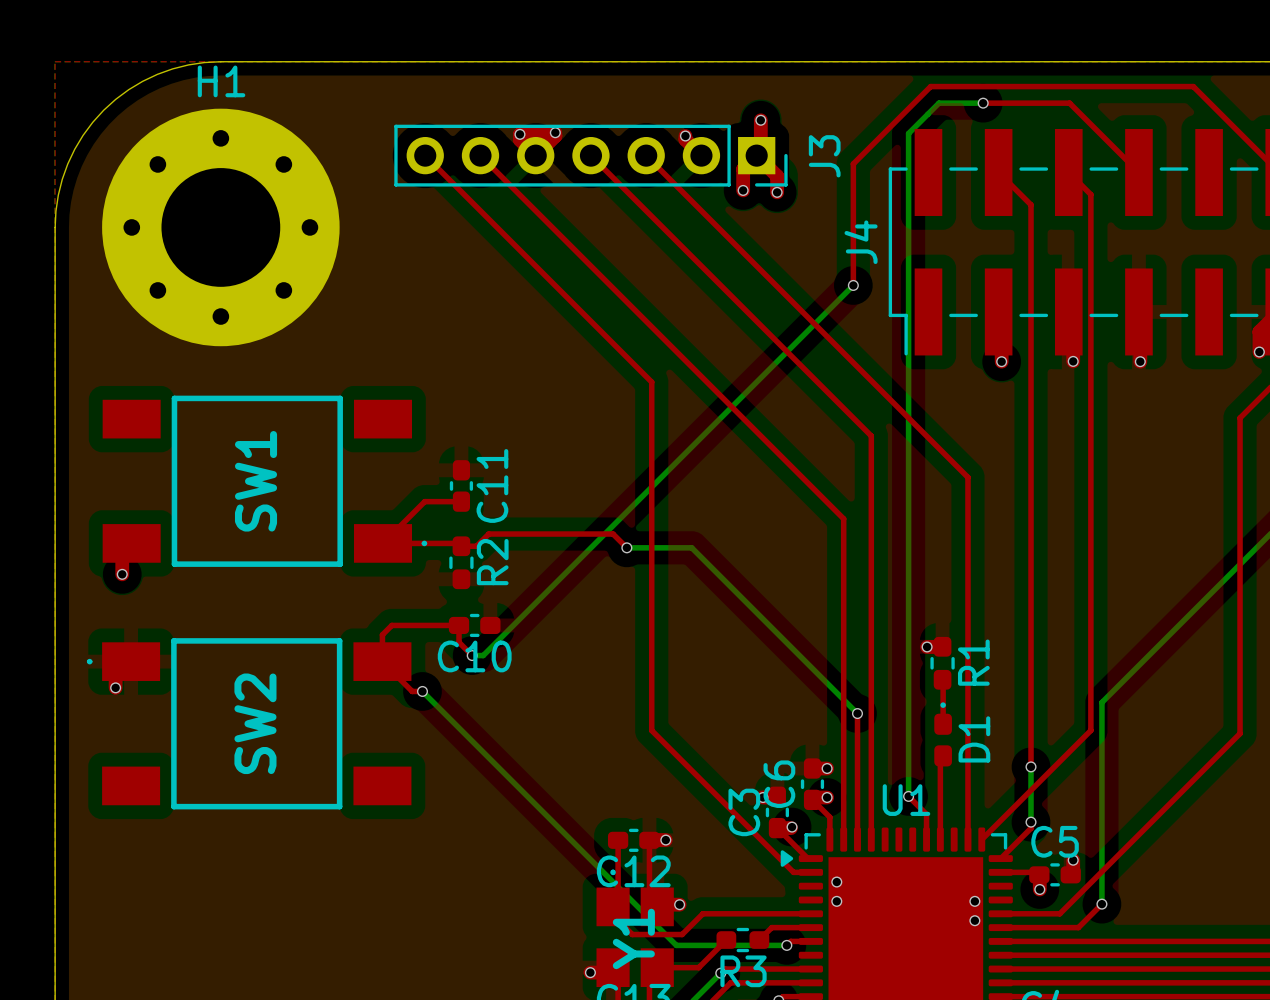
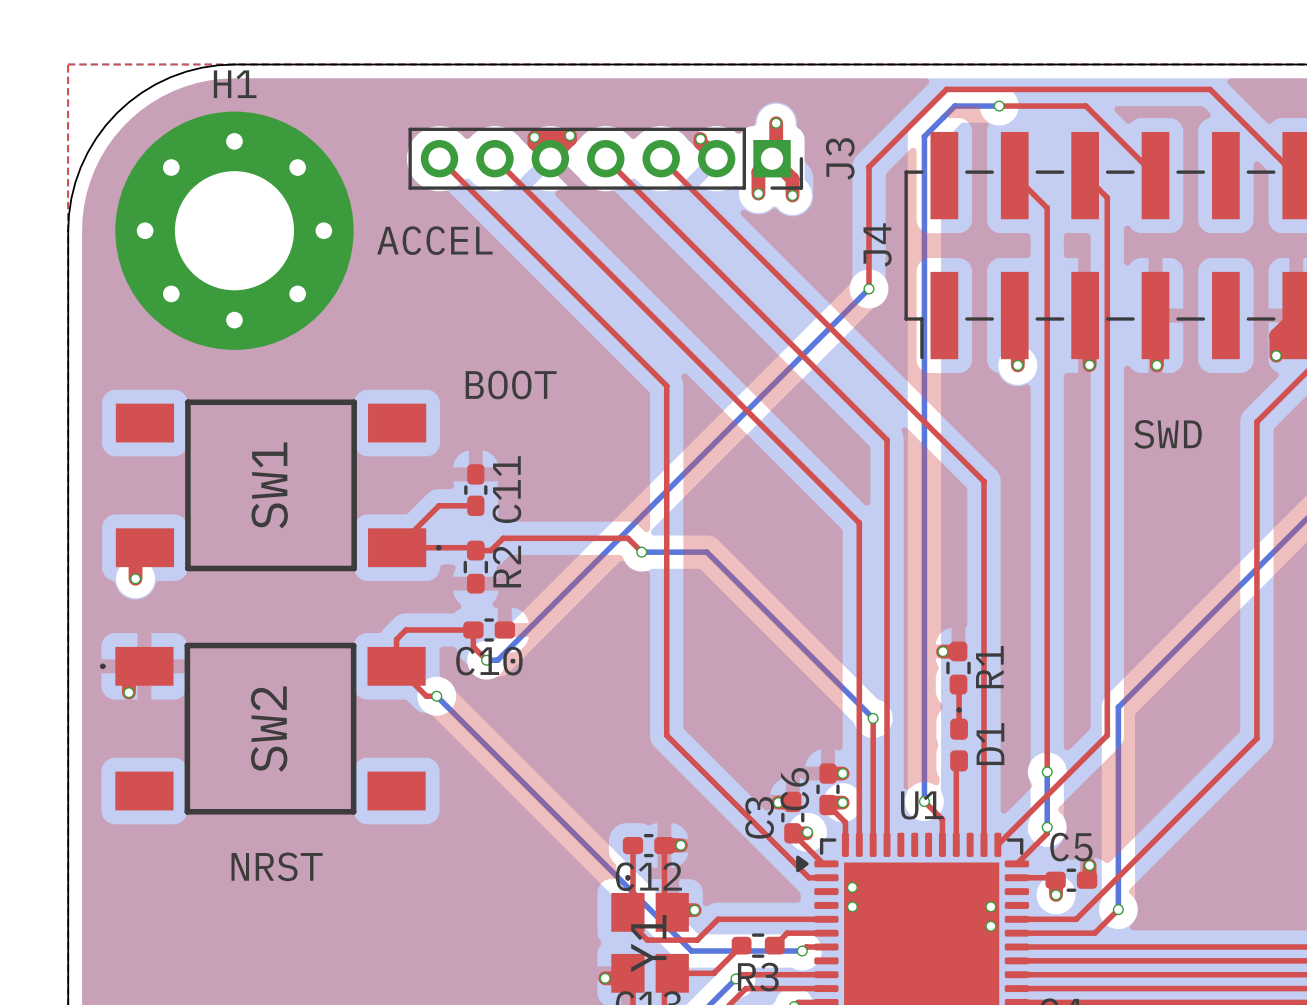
text: none -> ACCEL (434, 240)
text: none -> BOOT (511, 385)
text: none -> SWD (1168, 434)
text: none -> NRST (277, 866)

